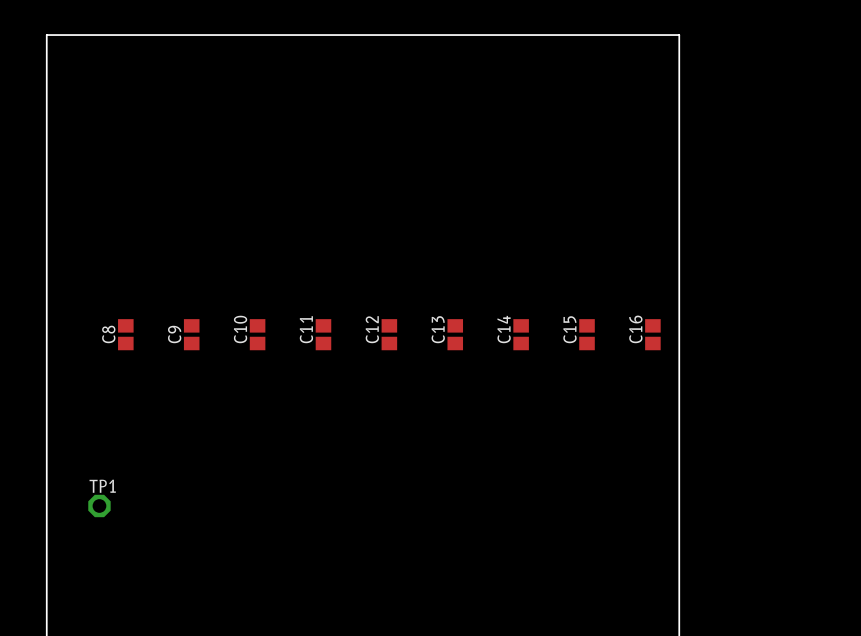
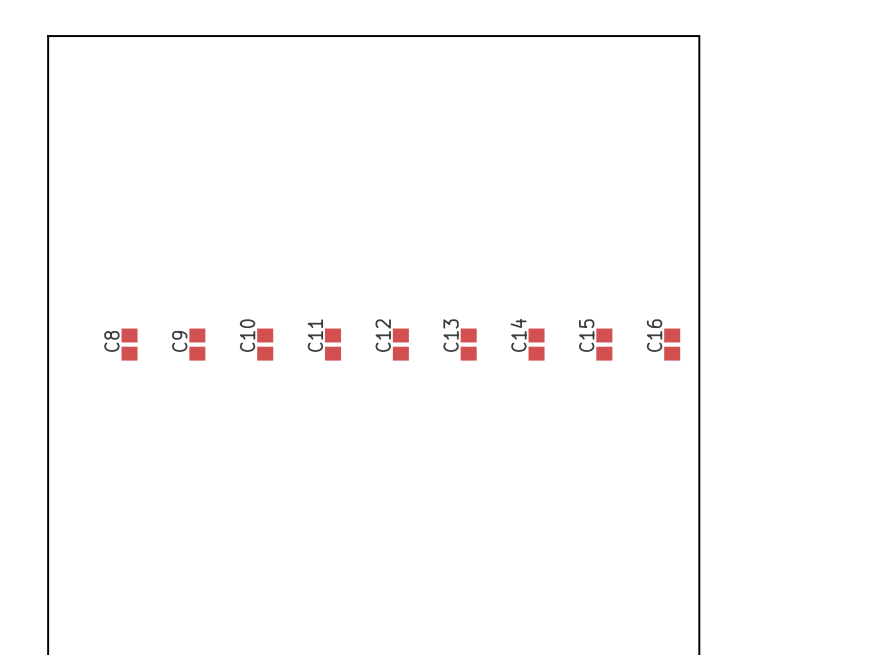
TP1: (99, 505) -> none

